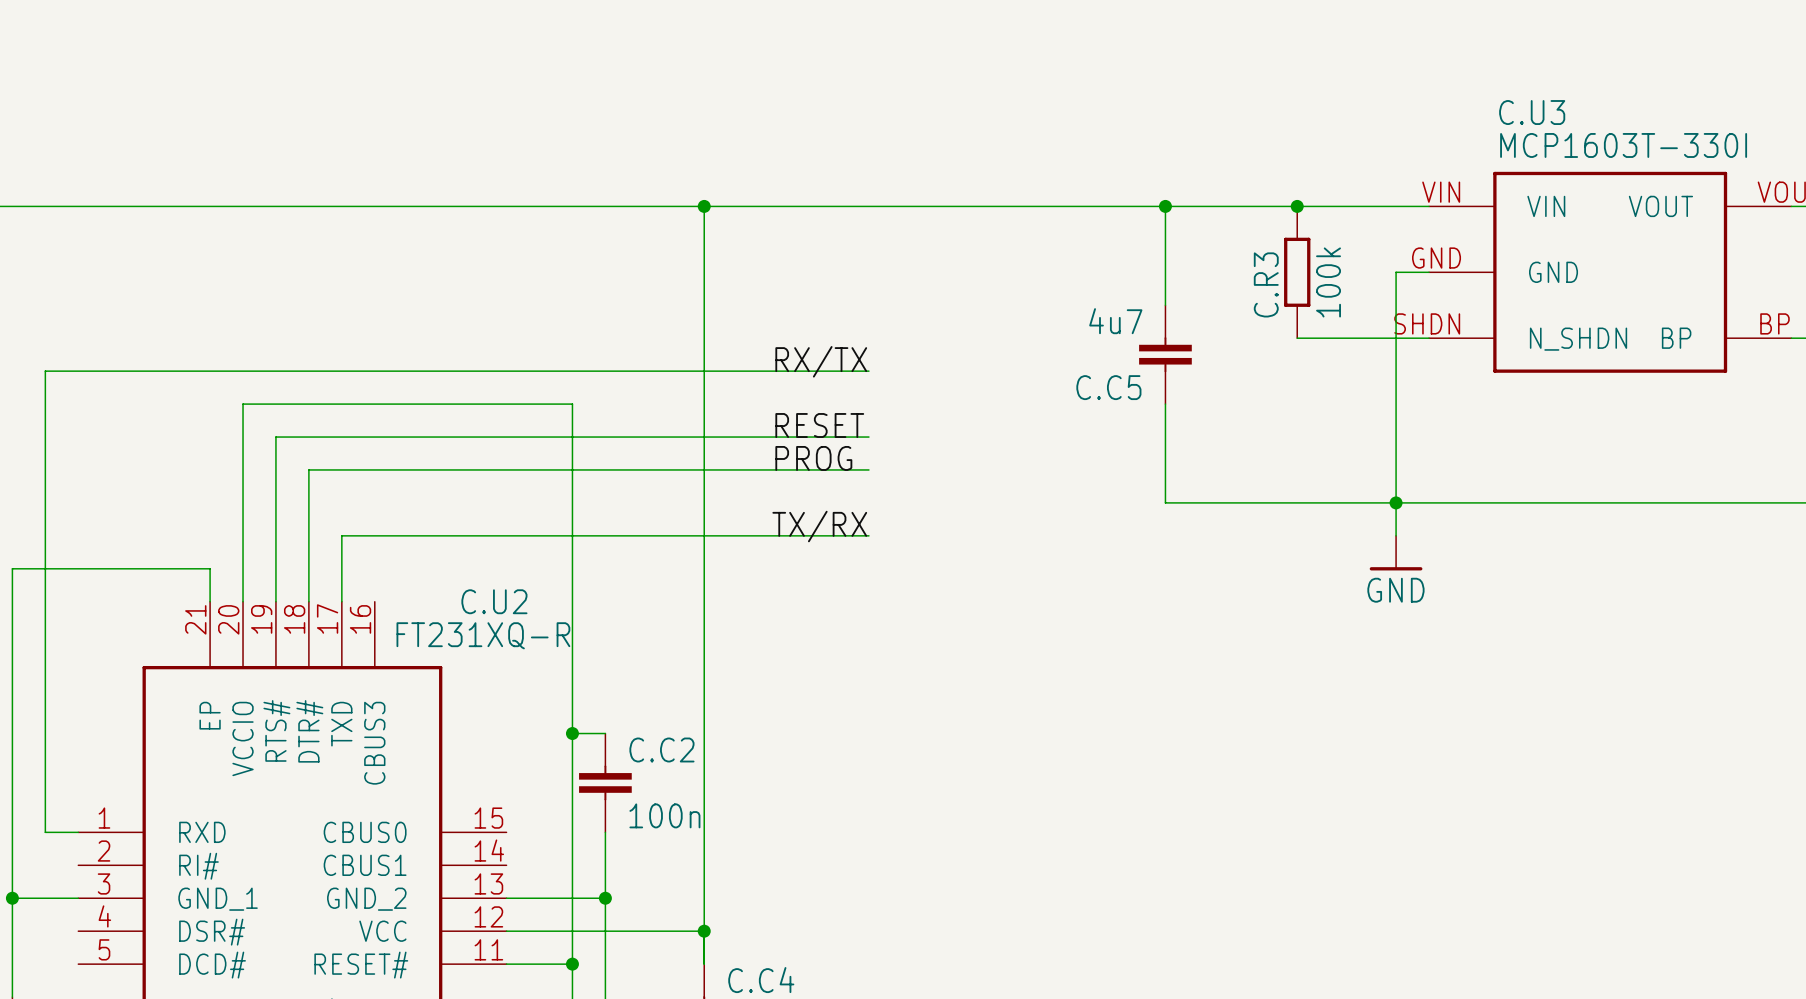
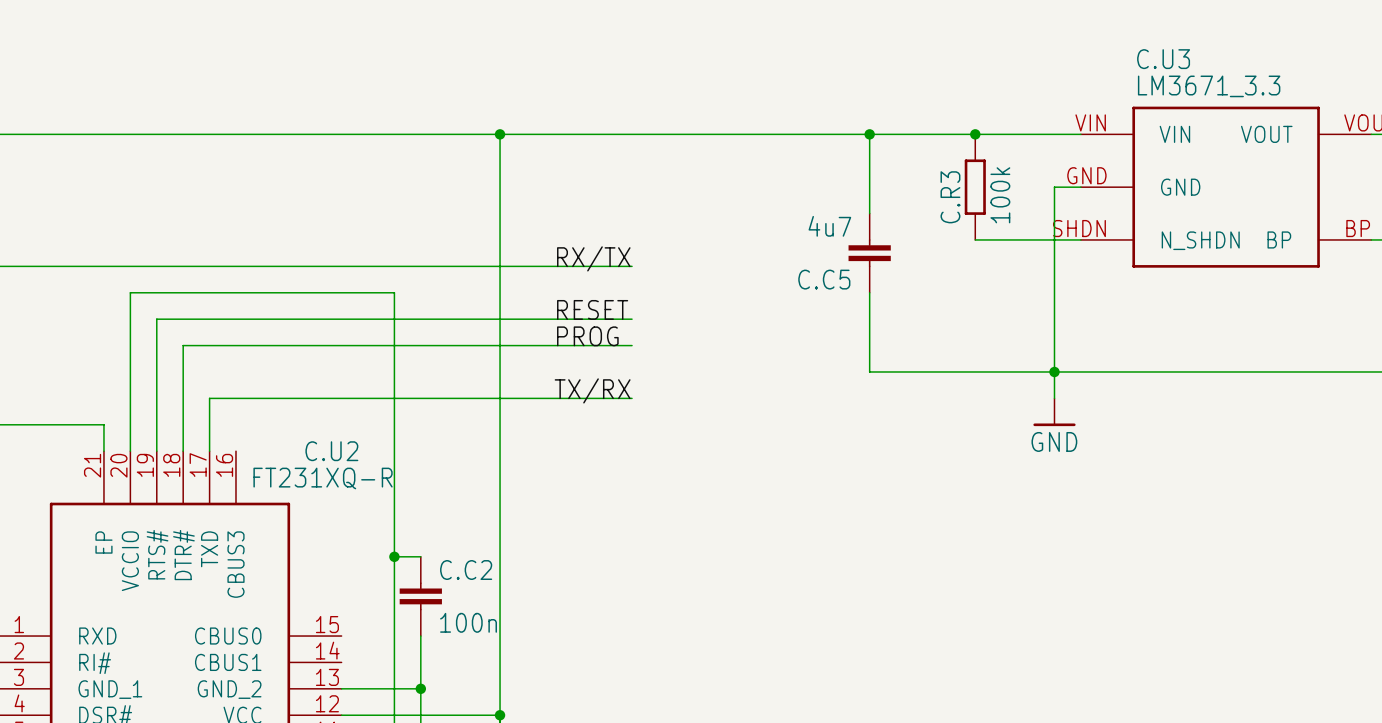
C.U3 value: MCP1603T-330I (1623, 145) -> LM3671_3.3 (1209, 86)

